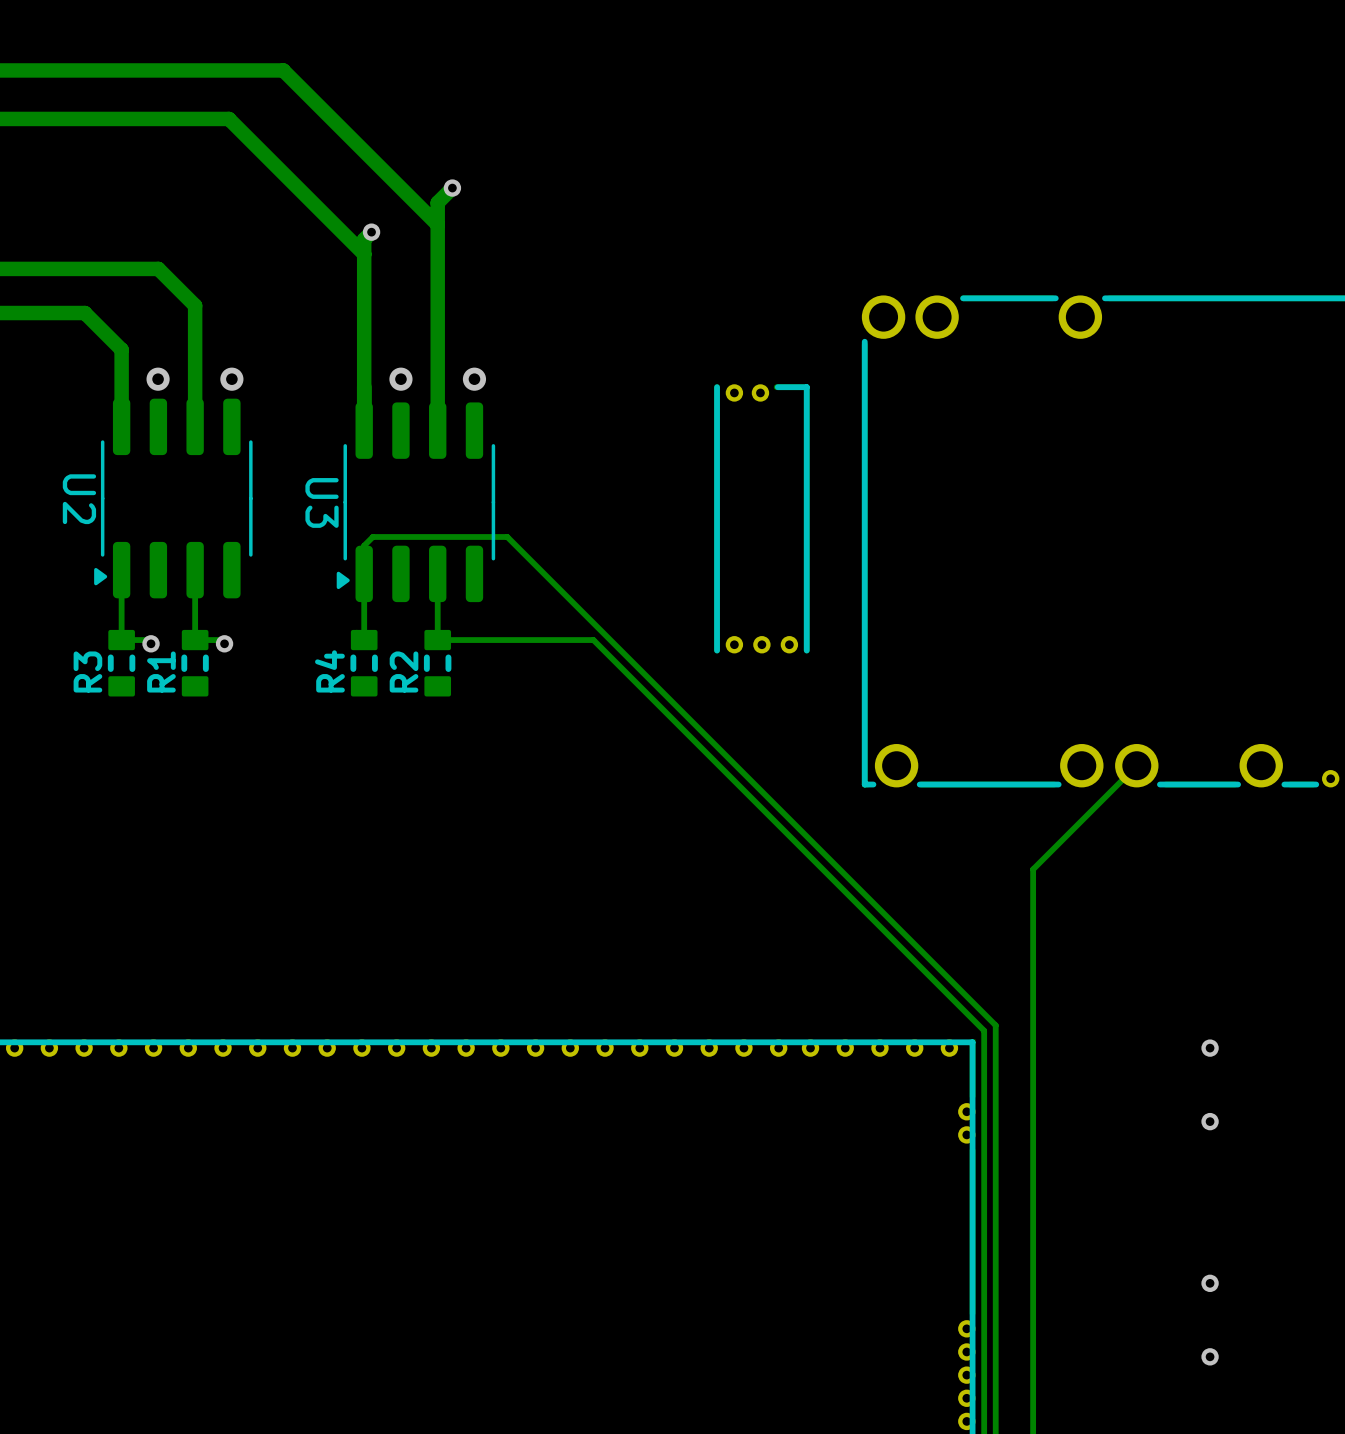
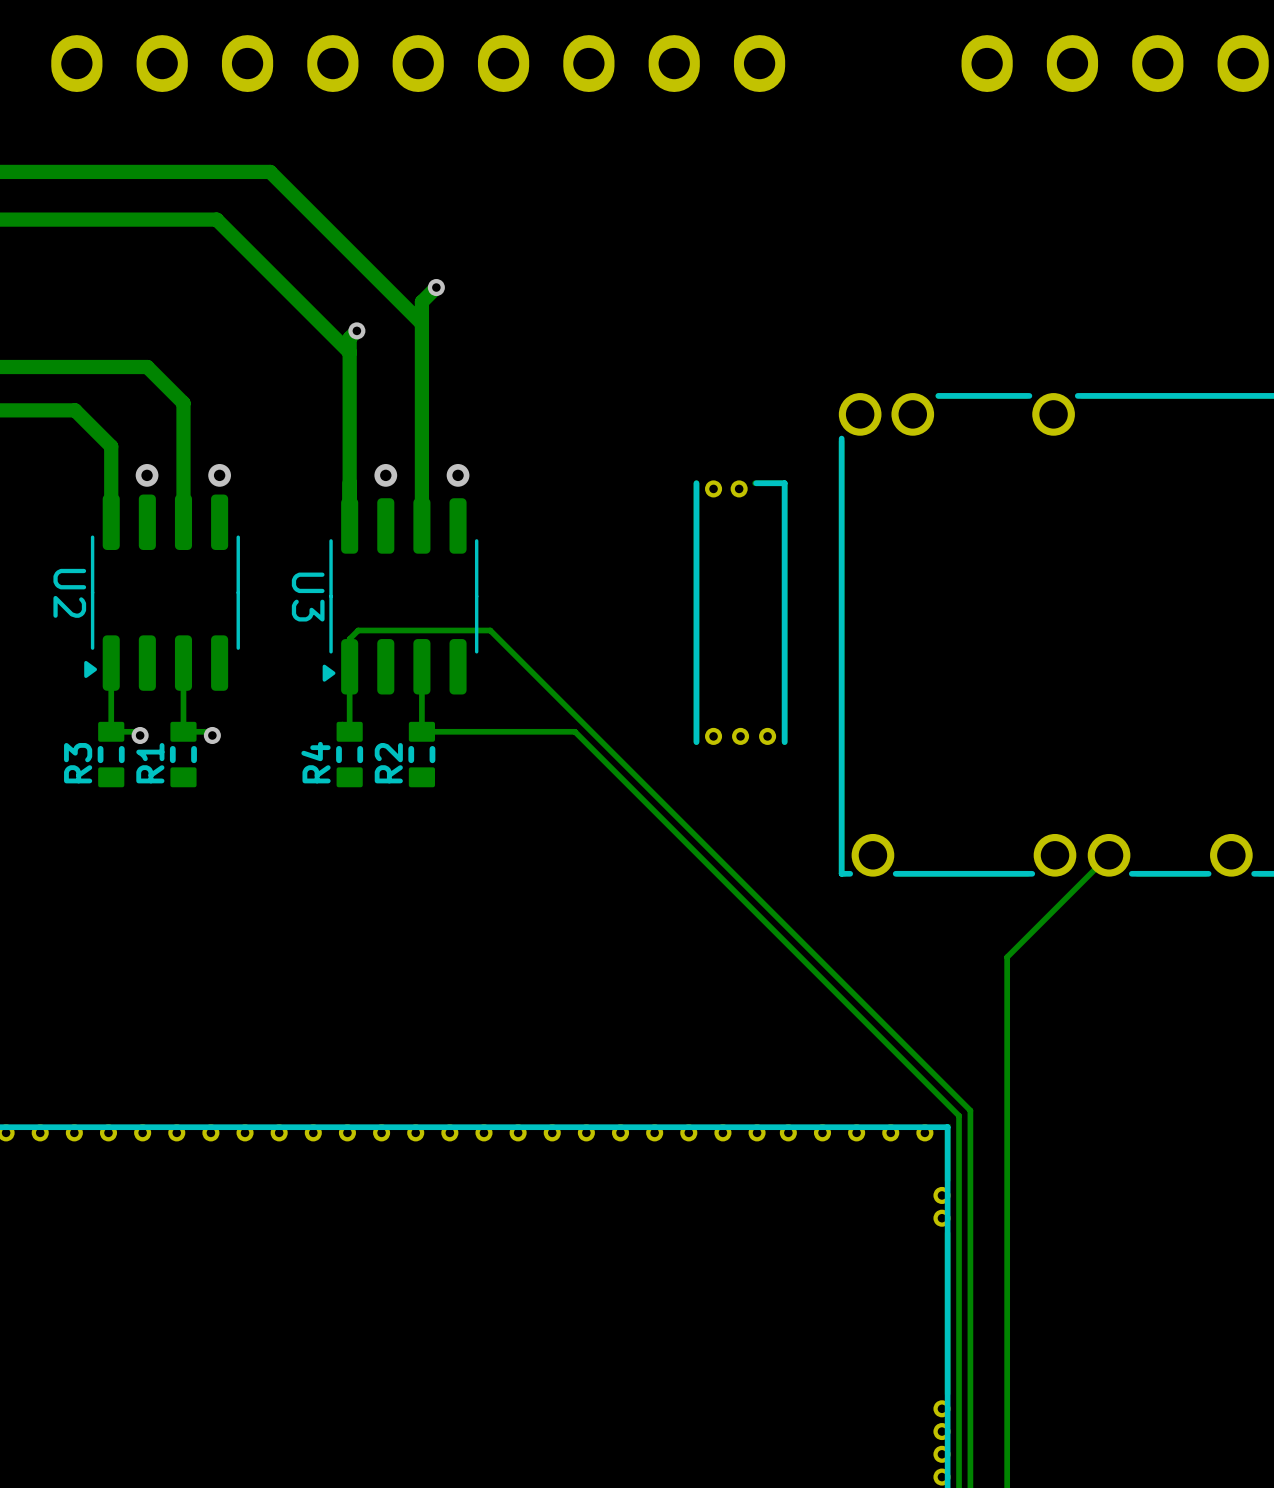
via: (1210, 1048) -> none
via: (1210, 1121) -> none
via: (1210, 1283) -> none
via: (1210, 1356) -> none

